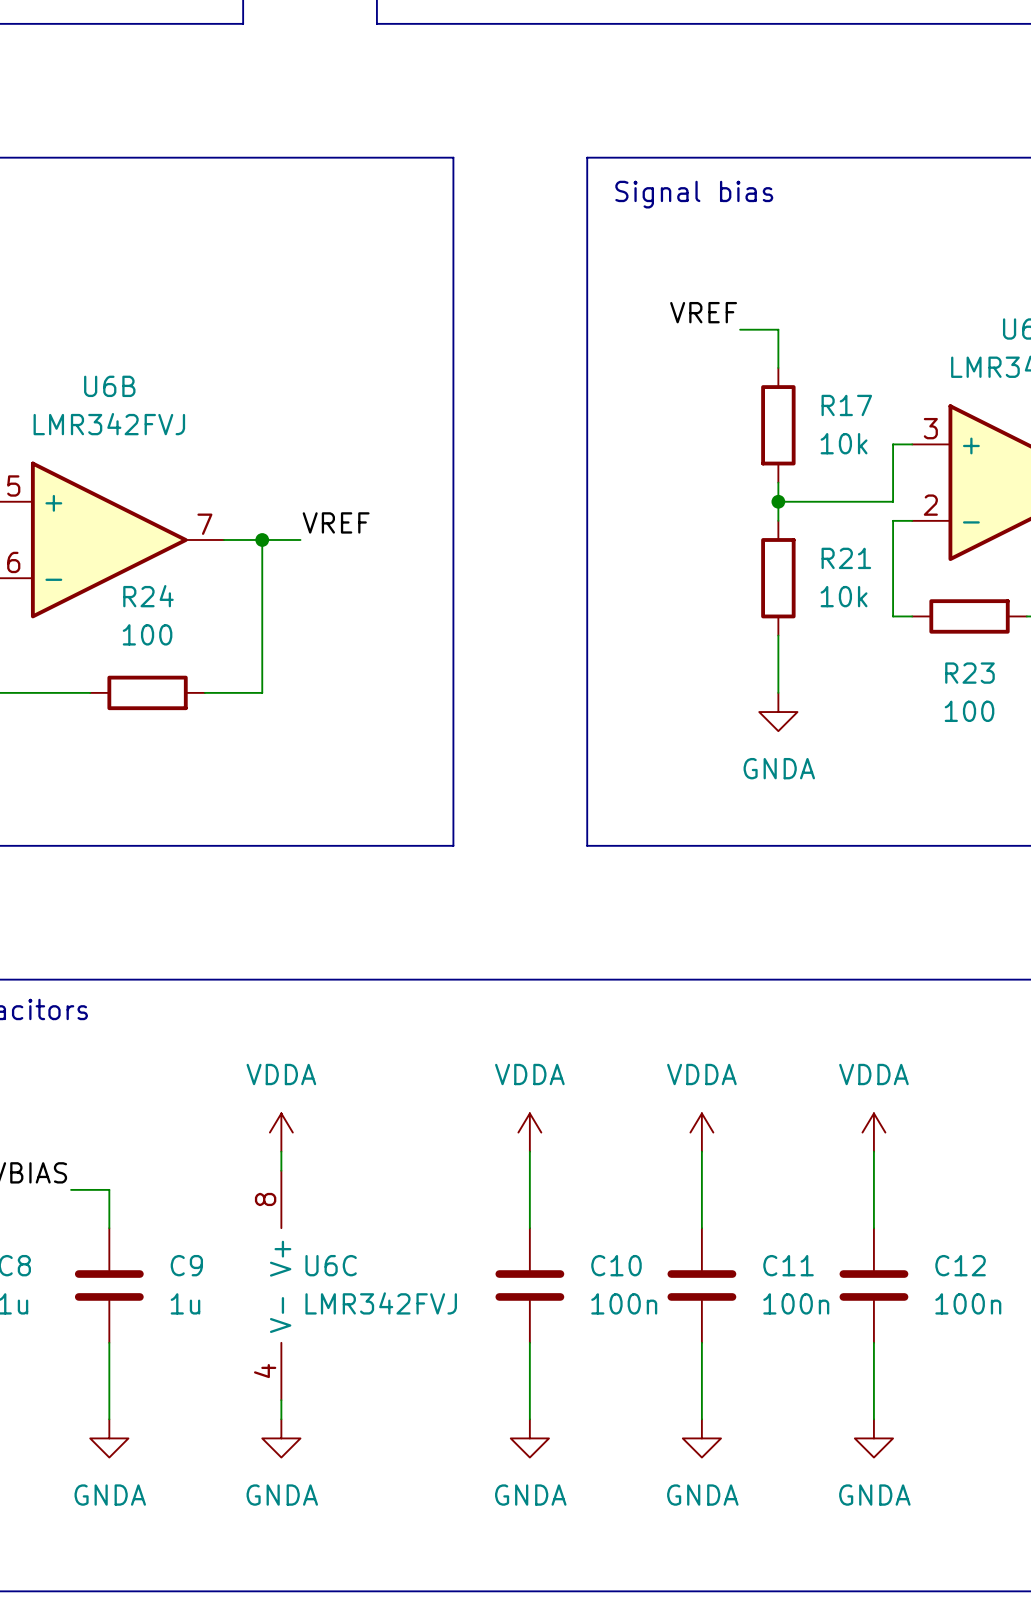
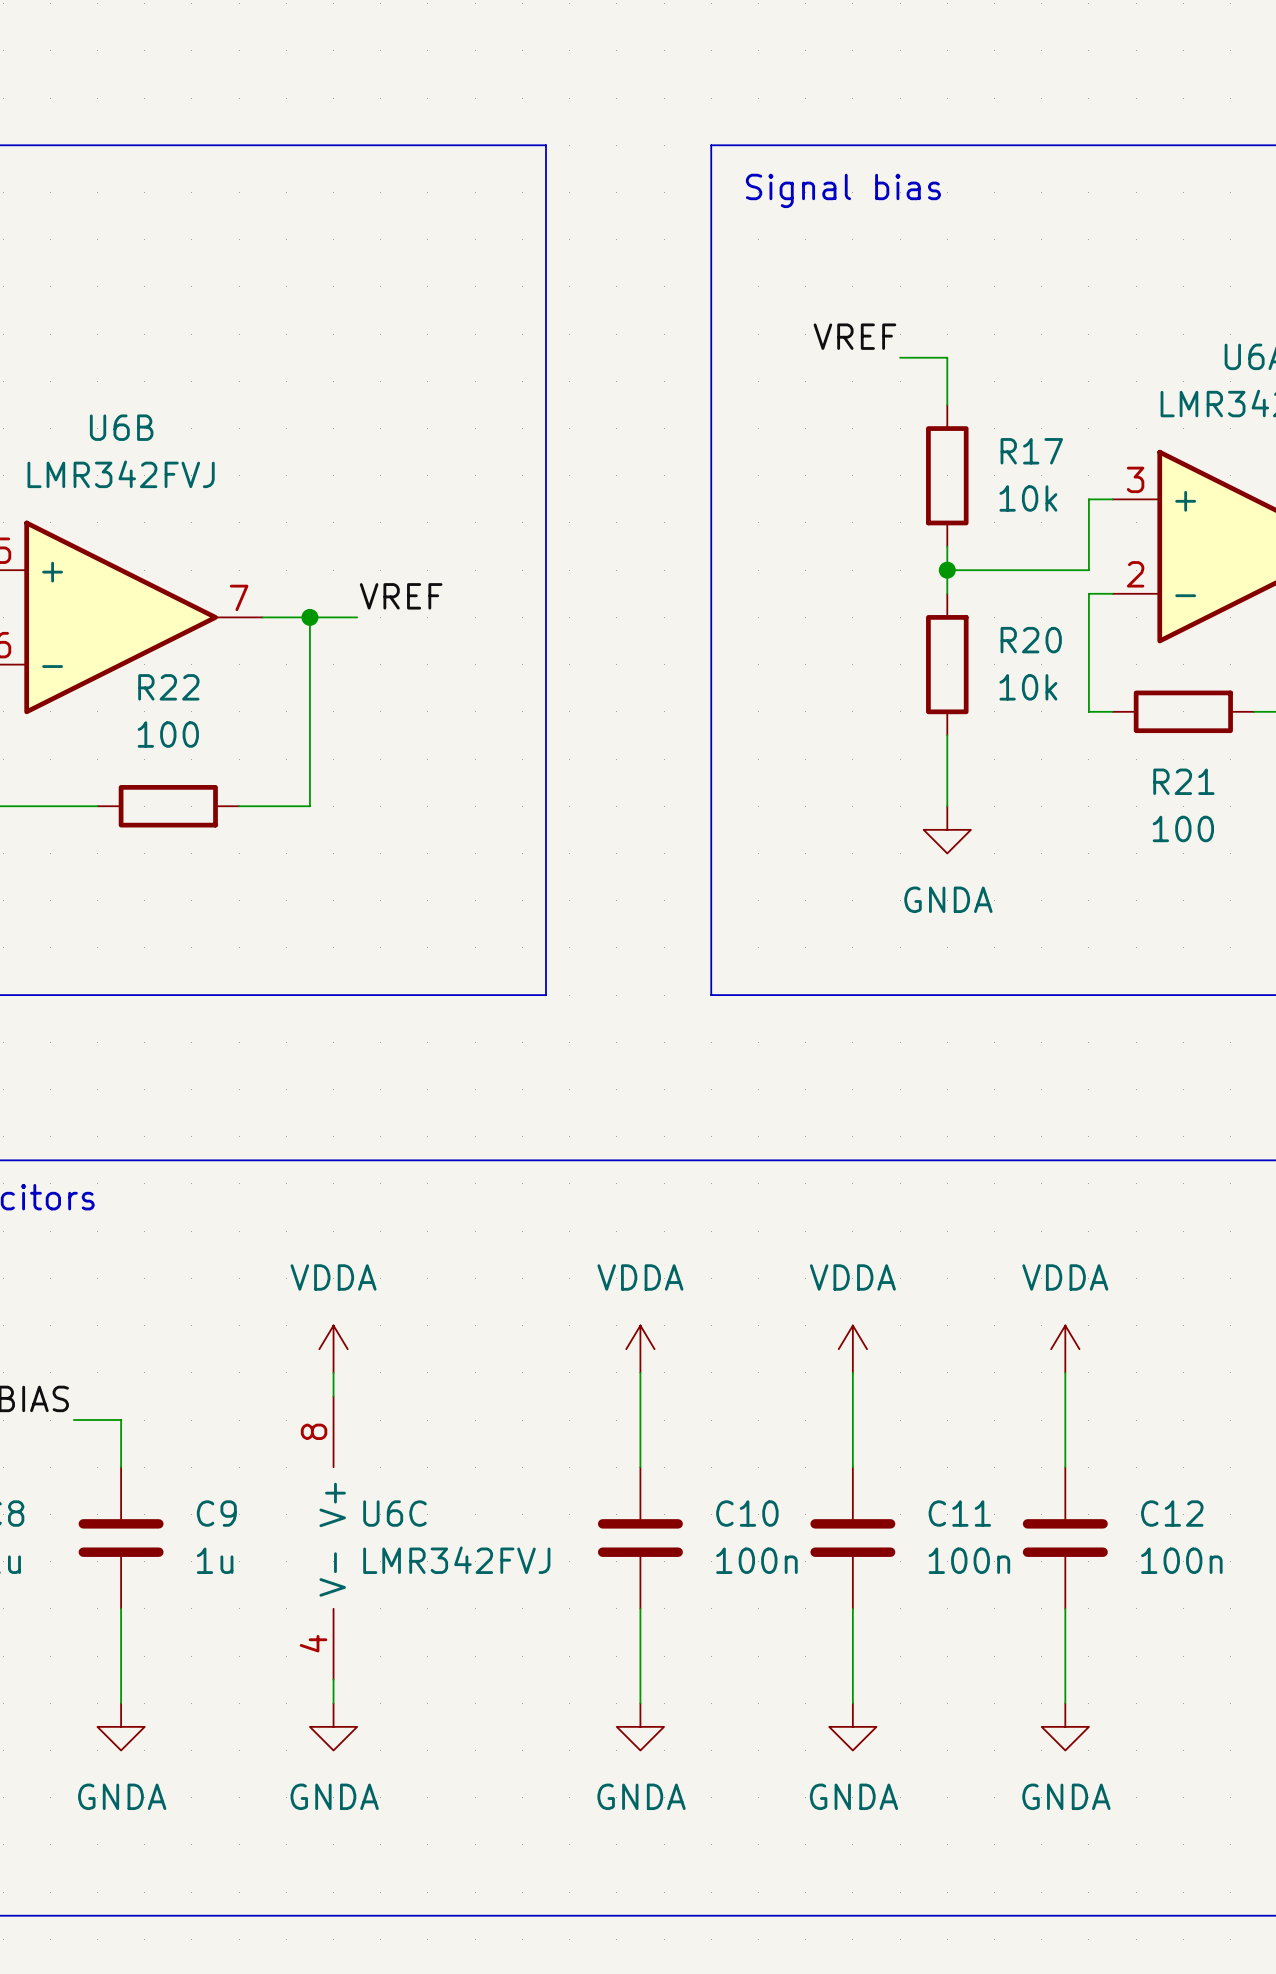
R21 name: R21 (846, 558) -> R20 (1031, 640)
R24 name: R24 (148, 596) -> R22 (168, 687)
R23 name: R23 (969, 673) -> R21 (1183, 781)

